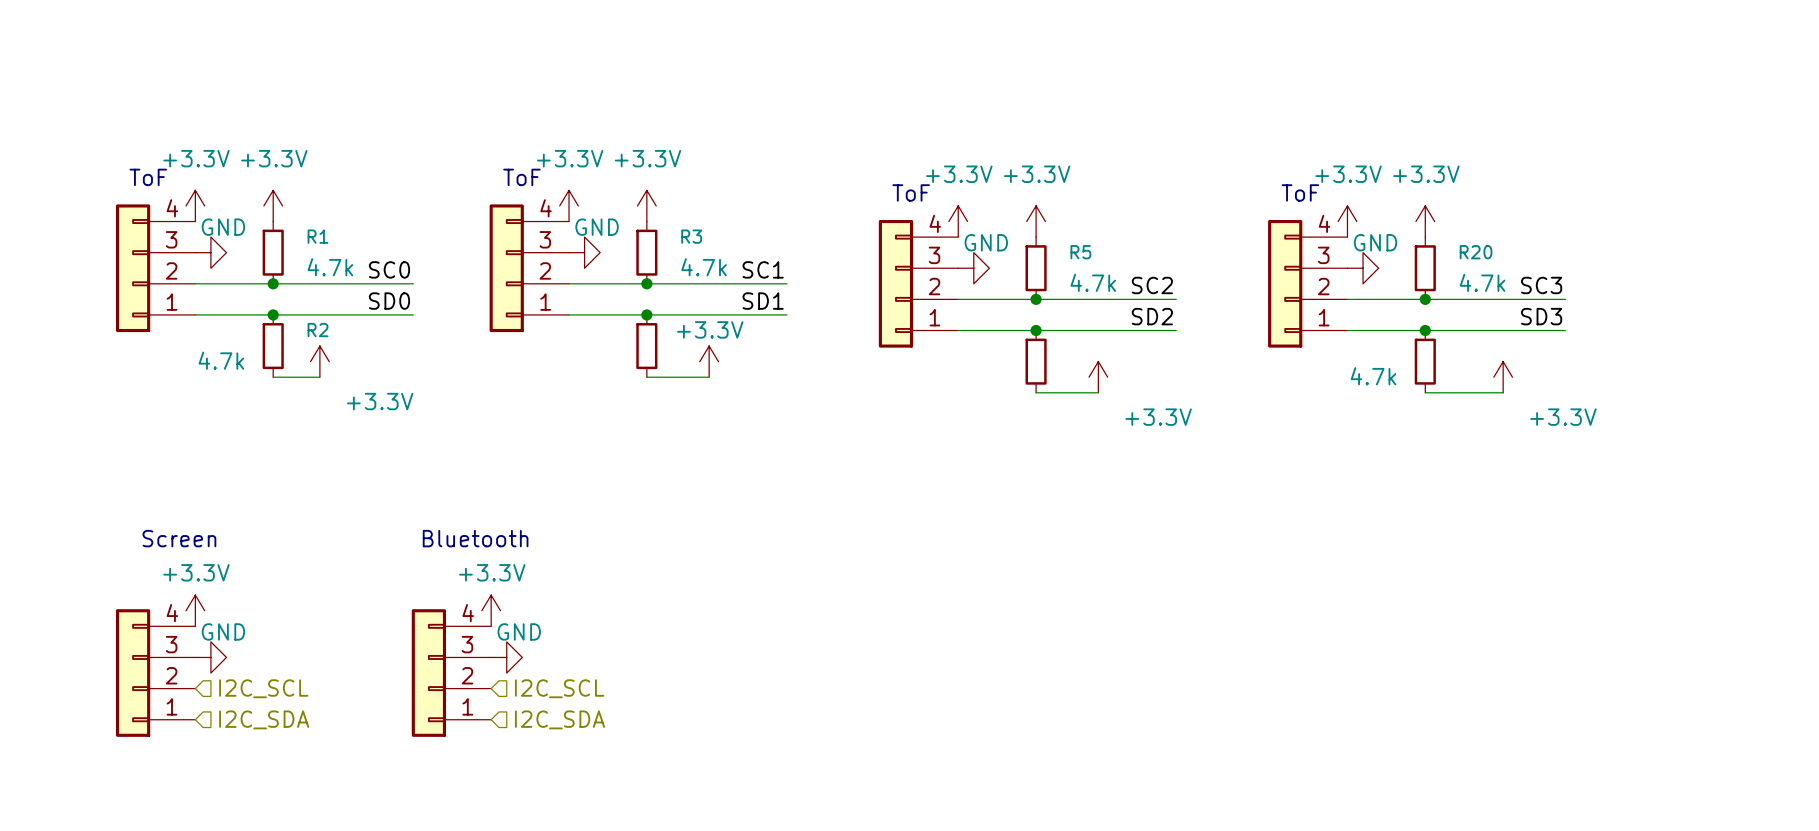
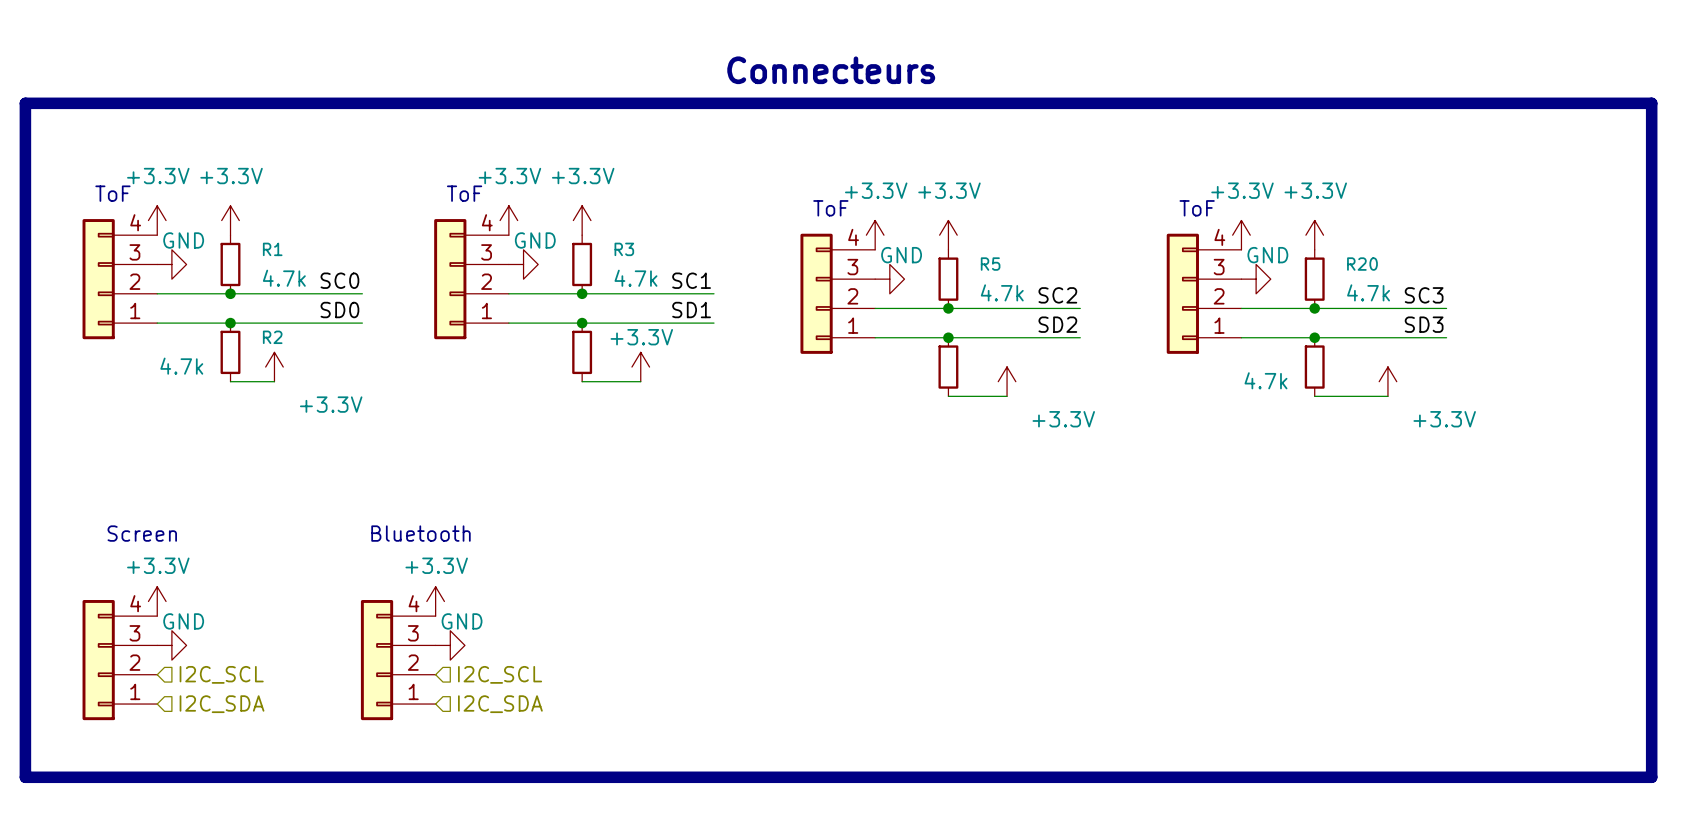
text: none -> Connecteurs (831, 70)
line: none -> (25, 103) (1651, 103) (1651, 777) (25, 777) (25, 103)

